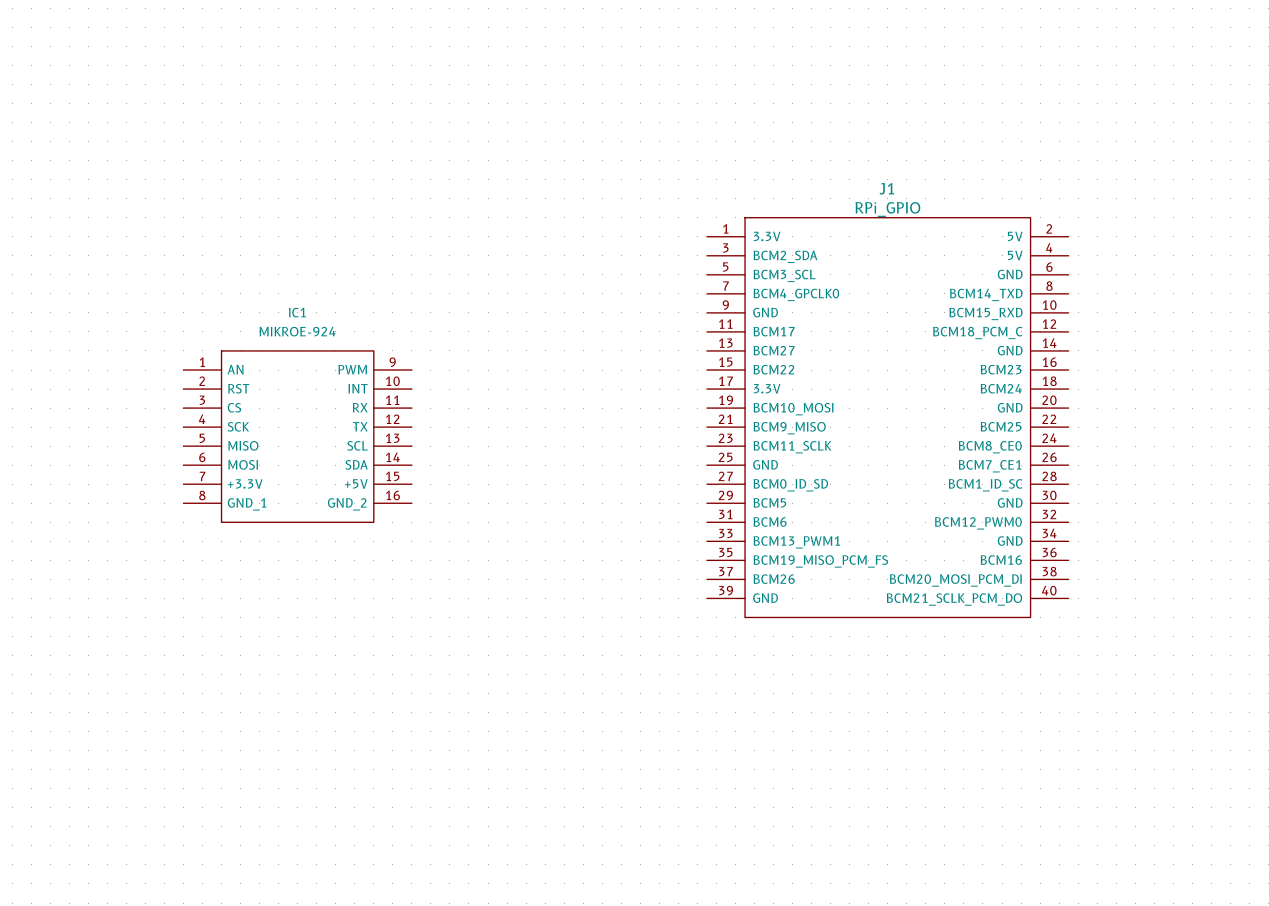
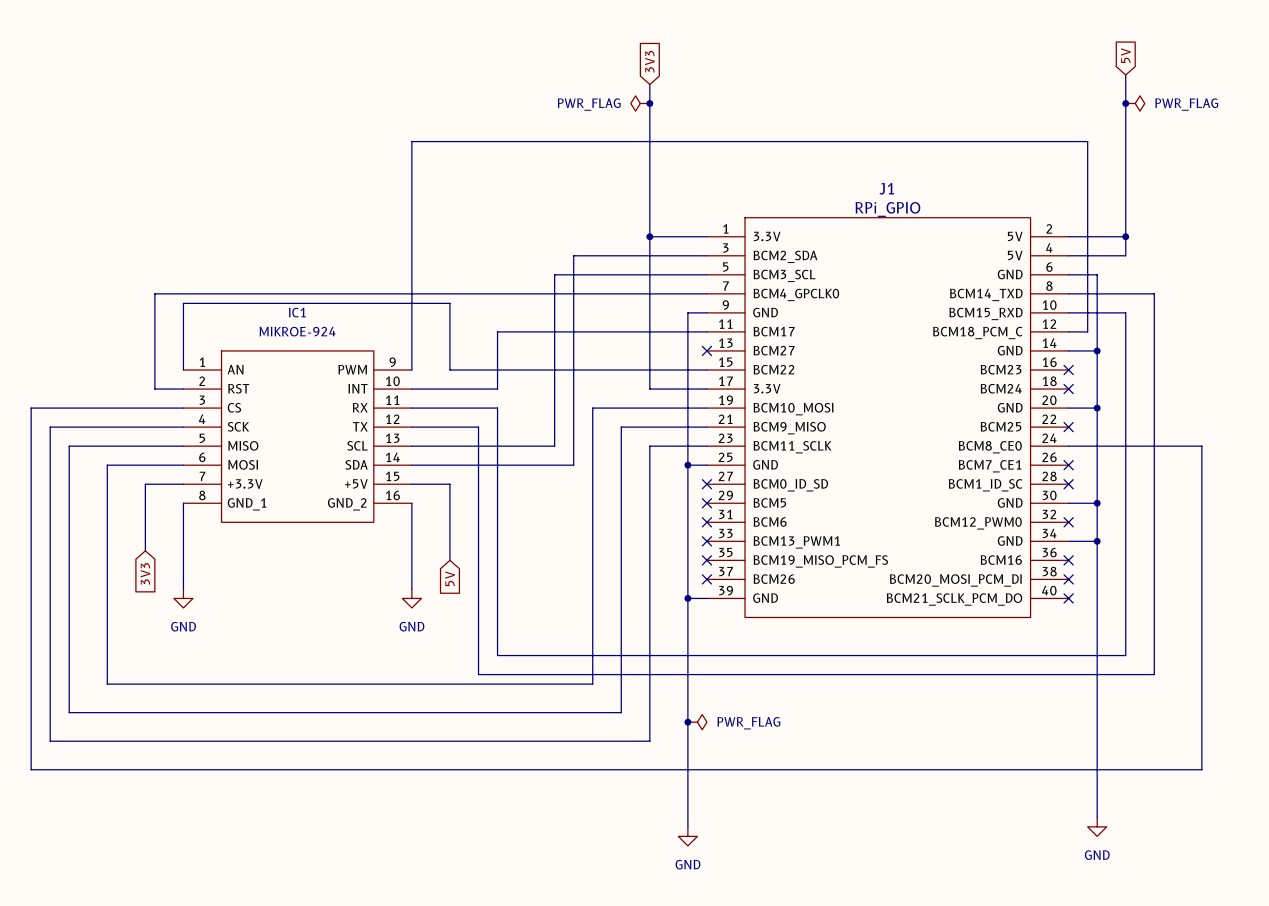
global label: none -> 5V (1125, 55)
global label: none -> 3V3 (649, 61)
wire: none -> (1125, 74) (1125, 255) (1068, 255)
wire: none -> (649, 84) (649, 389) (706, 389)
power symbol: none -> PWR_FLAG (640, 103)
junction: none -> (649, 103)
junction: none -> (1125, 103)
power symbol: none -> PWR_FLAG (1135, 103)
wire: none -> (649, 236) (706, 236)
junction: none -> (649, 236)
wire: none -> (1068, 236) (1125, 236)
junction: none -> (1125, 236)
wire: none -> (706, 255) (573, 255) (573, 465) (411, 465)
wire: none -> (706, 274) (554, 274) (554, 446) (411, 446)
wire: none -> (1068, 274) (1097, 274) (1097, 817)
wire: none -> (706, 293) (154, 293) (154, 389) (183, 389)
wire: none -> (1068, 293) (1154, 293) (1154, 674) (478, 674) (478, 427) (411, 427)
wire: none -> (706, 312) (687, 312) (687, 826)
wire: none -> (1068, 312) (1125, 312) (1125, 655) (497, 655) (497, 408) (411, 408)
wire: none -> (706, 331) (497, 331) (497, 389) (411, 389)
wire: none -> (1068, 331) (1087, 331) (1087, 141) (411, 141) (411, 370)
no-connect mark: none -> (706, 350)
wire: none -> (1068, 350) (1097, 350)
junction: none -> (1097, 350)
wire: none -> (183, 370) (183, 303) (449, 303) (449, 370) (706, 370)
no-connect mark: none -> (1068, 370)
no-connect mark: none -> (1068, 389)
wire: none -> (183, 408) (31, 408) (31, 769) (1201, 769) (1201, 446) (1068, 446)
wire: none -> (706, 408) (592, 408) (592, 684) (107, 684) (107, 465) (183, 465)
wire: none -> (1068, 408) (1097, 408)
junction: none -> (1097, 408)
wire: none -> (183, 427) (50, 427) (50, 741) (649, 741) (649, 446) (706, 446)
wire: none -> (706, 427) (621, 427) (621, 712) (69, 712) (69, 446) (183, 446)
no-connect mark: none -> (1068, 427)
wire: none -> (687, 465) (706, 465)
junction: none -> (687, 465)
no-connect mark: none -> (1068, 465)
wire: none -> (183, 484) (145, 484) (145, 550)
wire: none -> (411, 484) (449, 484) (449, 560)
no-connect mark: none -> (706, 484)
no-connect mark: none -> (1068, 484)
wire: none -> (183, 503) (183, 588)
wire: none -> (411, 503) (411, 588)
no-connect mark: none -> (706, 503)
wire: none -> (1068, 503) (1097, 503)
junction: none -> (1097, 503)
no-connect mark: none -> (706, 522)
no-connect mark: none -> (1068, 522)
no-connect mark: none -> (706, 541)
wire: none -> (1068, 541) (1097, 541)
junction: none -> (1097, 541)
no-connect mark: none -> (706, 560)
no-connect mark: none -> (1068, 560)
global label: none -> 3V3 (145, 573)
global label: none -> 5V (450, 578)
no-connect mark: none -> (706, 579)
no-connect mark: none -> (1068, 579)
power symbol: none -> GND (183, 598)
power symbol: none -> GND (411, 598)
wire: none -> (687, 598) (706, 598)
junction: none -> (687, 598)
no-connect mark: none -> (1068, 598)
junction: none -> (687, 722)
power symbol: none -> PWR_FLAG (697, 722)
power symbol: none -> GND (1097, 826)
power symbol: none -> GND (687, 836)

